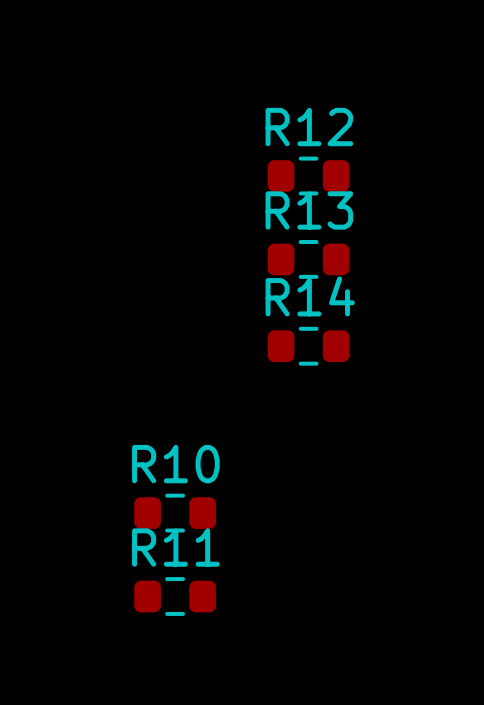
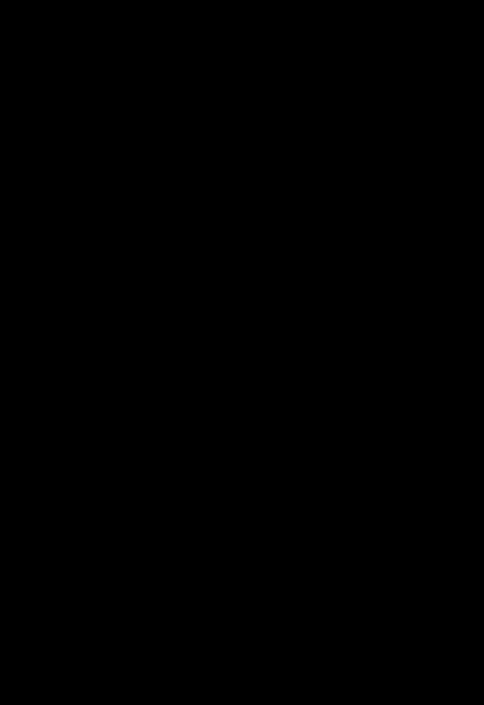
R12: (308, 176) -> none
R13: (308, 259) -> none
R14: (308, 346) -> none
R10: (175, 513) -> none
R11: (175, 596) -> none

